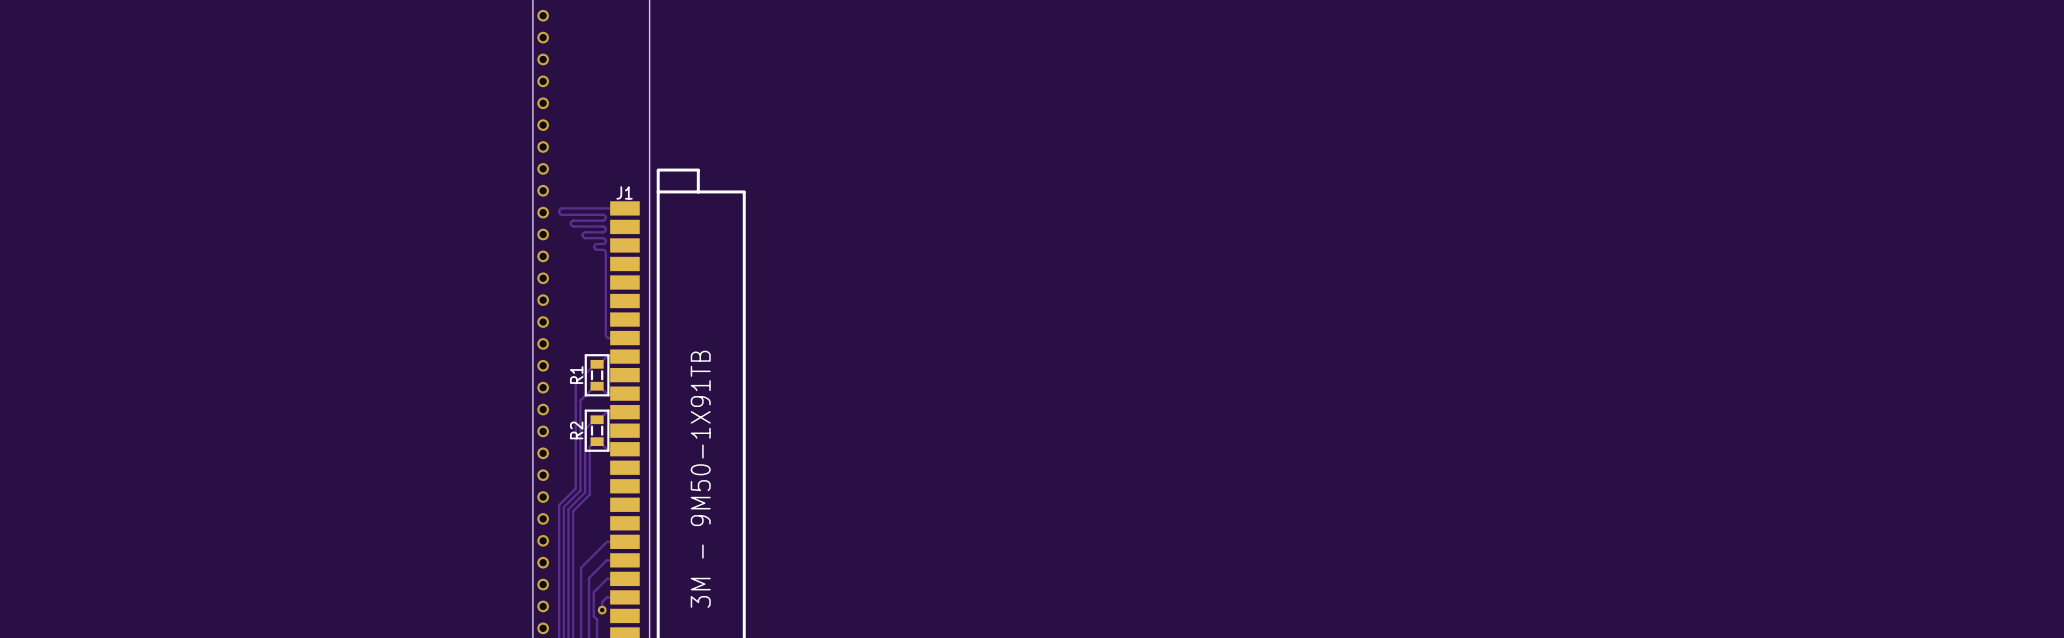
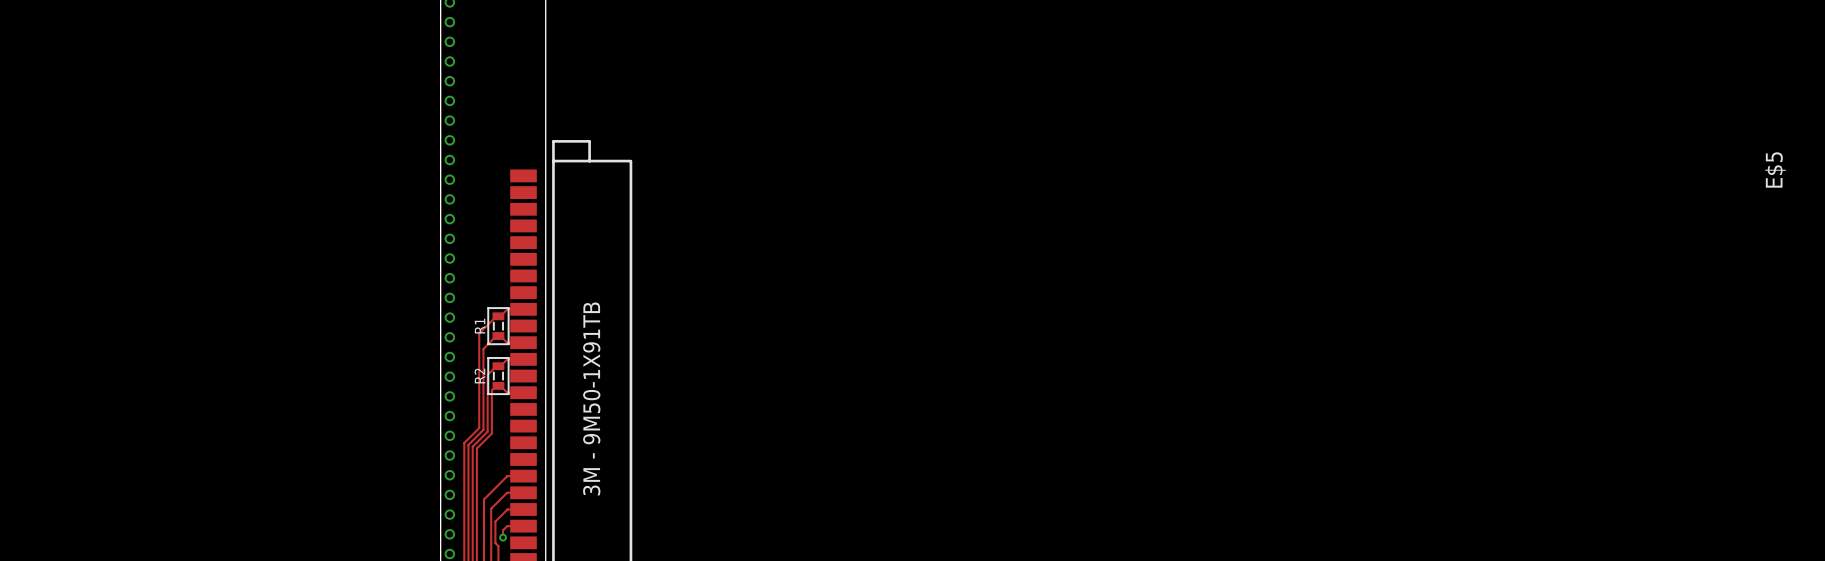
J1 name: J1 (624, 192) -> E$5 (1775, 169)
track: (624, 208) (562, 208) (559, 211) (561, 214) (605, 216) (603, 220) (573, 220) (570, 223) (573, 226) (602, 226) (605, 228) (603, 232) (585, 232) (582, 235) (585, 238) (603, 238) (605, 239) (604, 243) (596, 244) (594, 246) (595, 249) (603, 249) (605, 252) (605, 335) (608, 338) (624, 338) -> none

